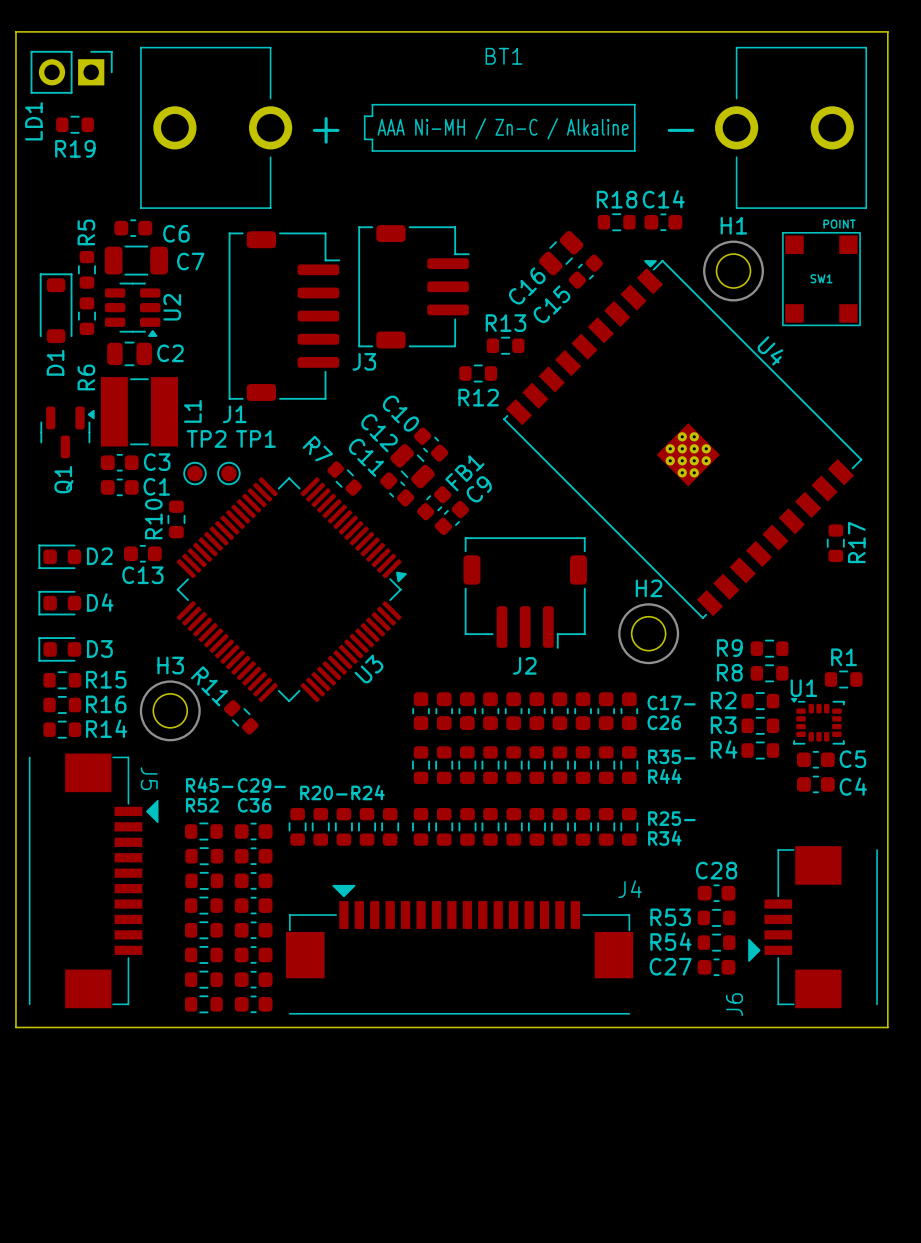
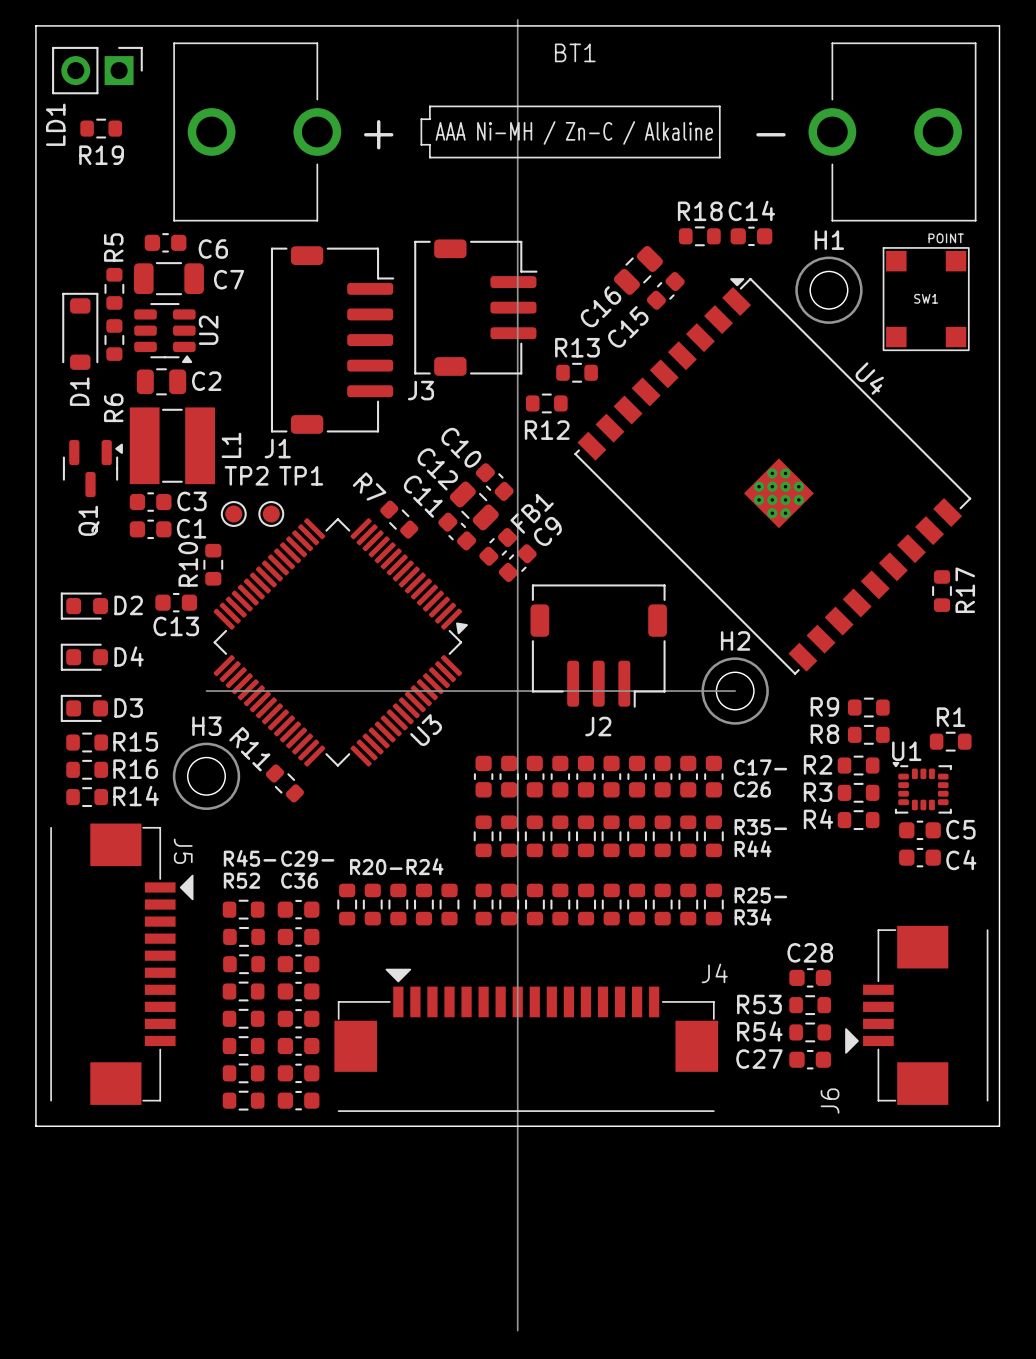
line: none -> (517, 19) (517, 1330)
line: none -> (206, 691) (735, 691)

